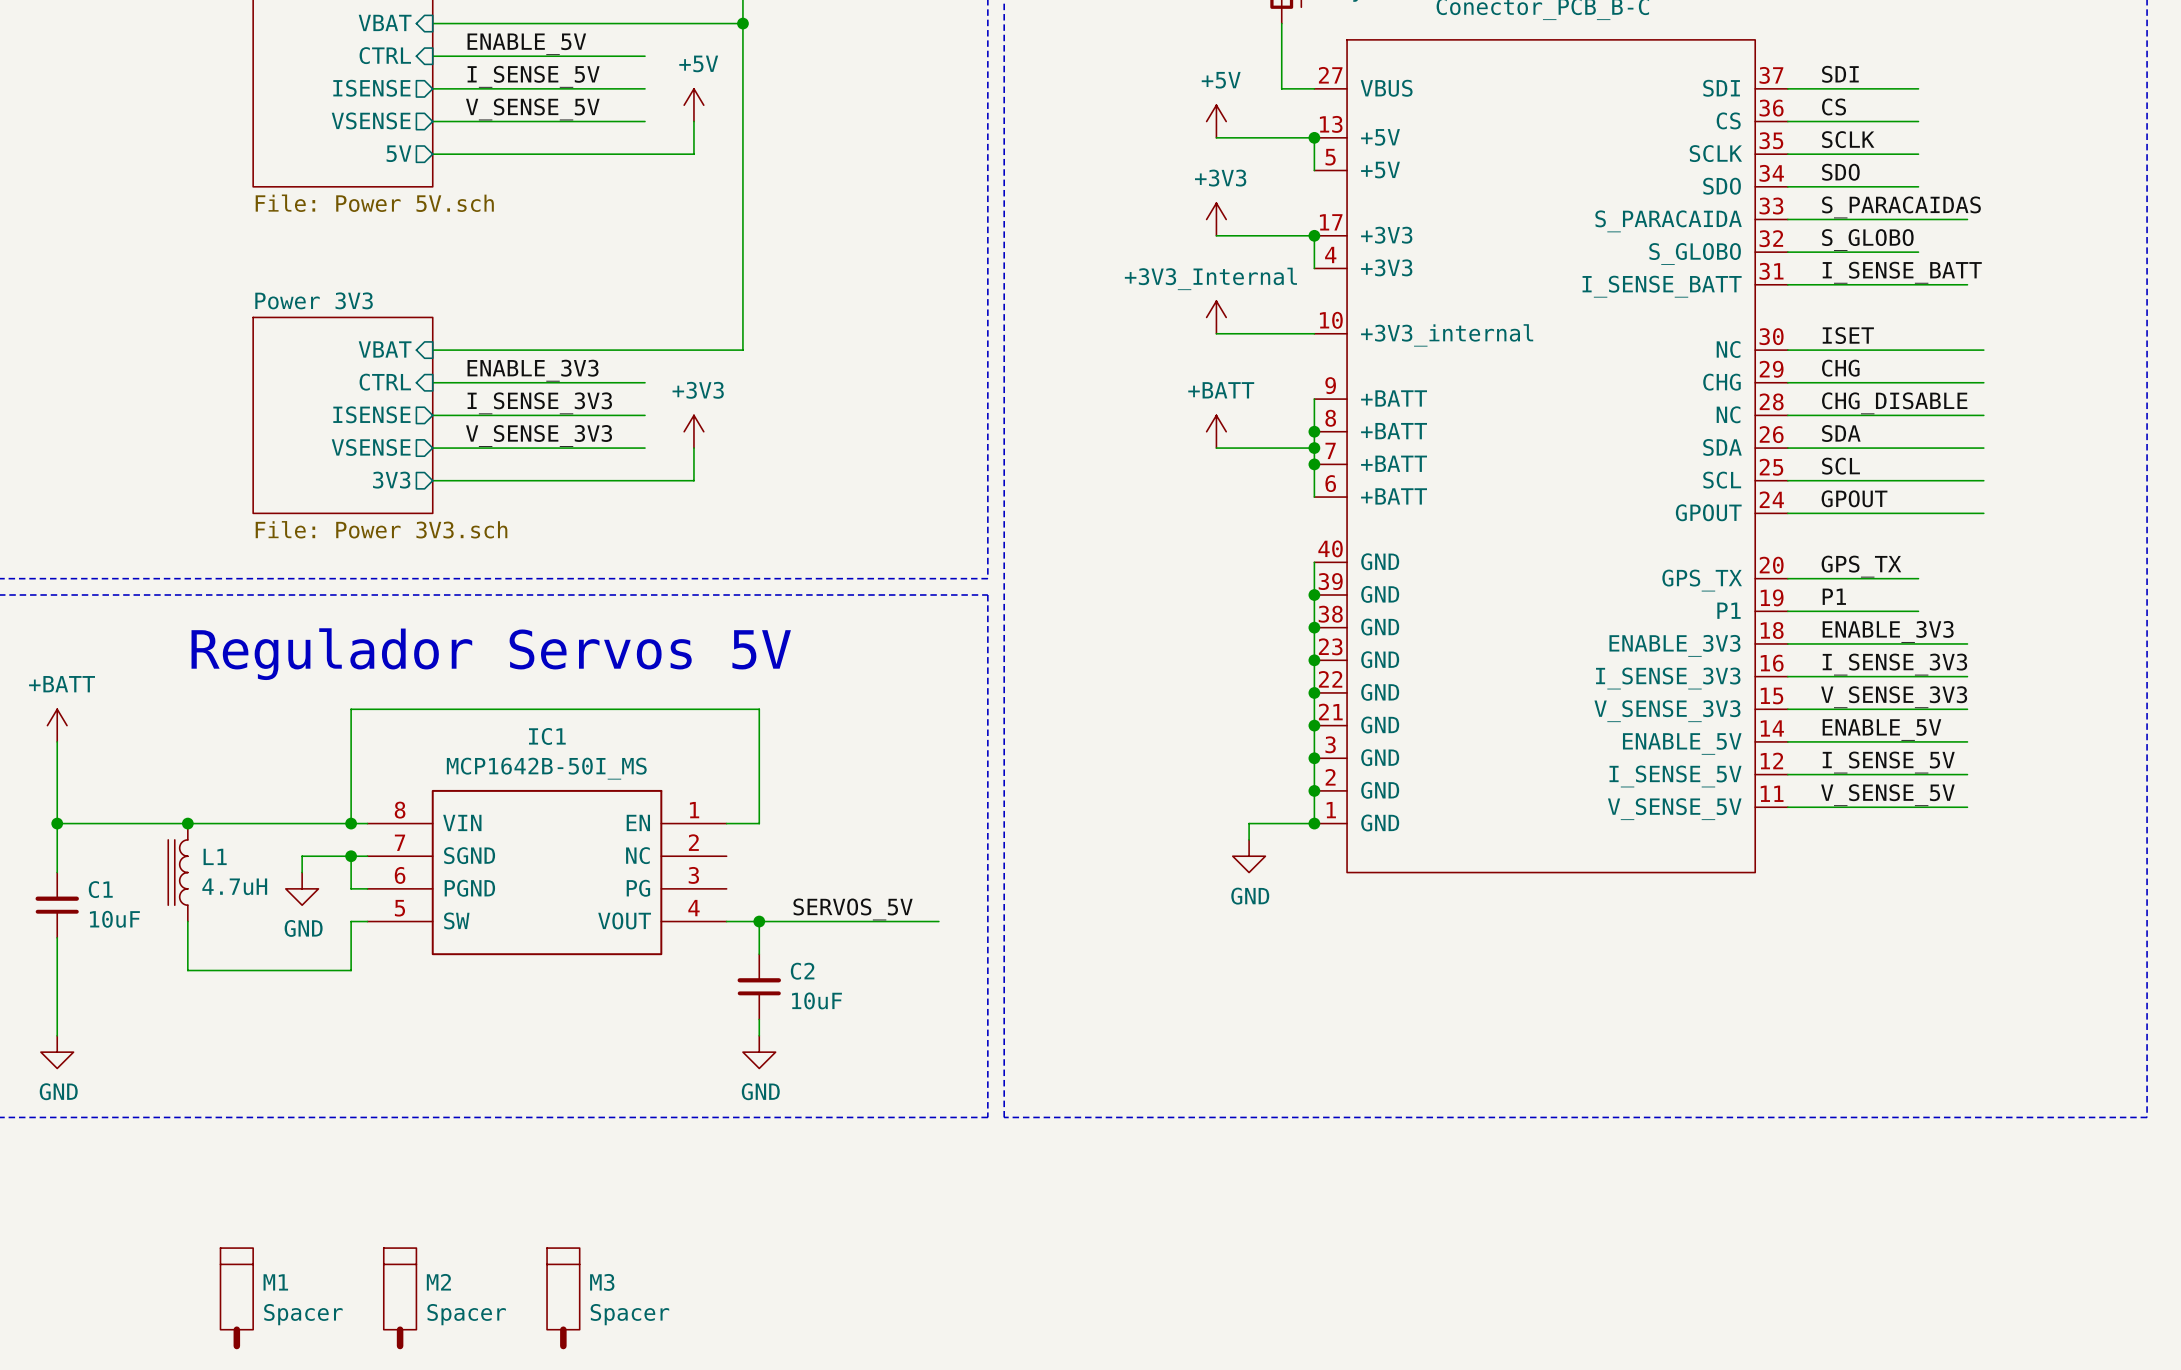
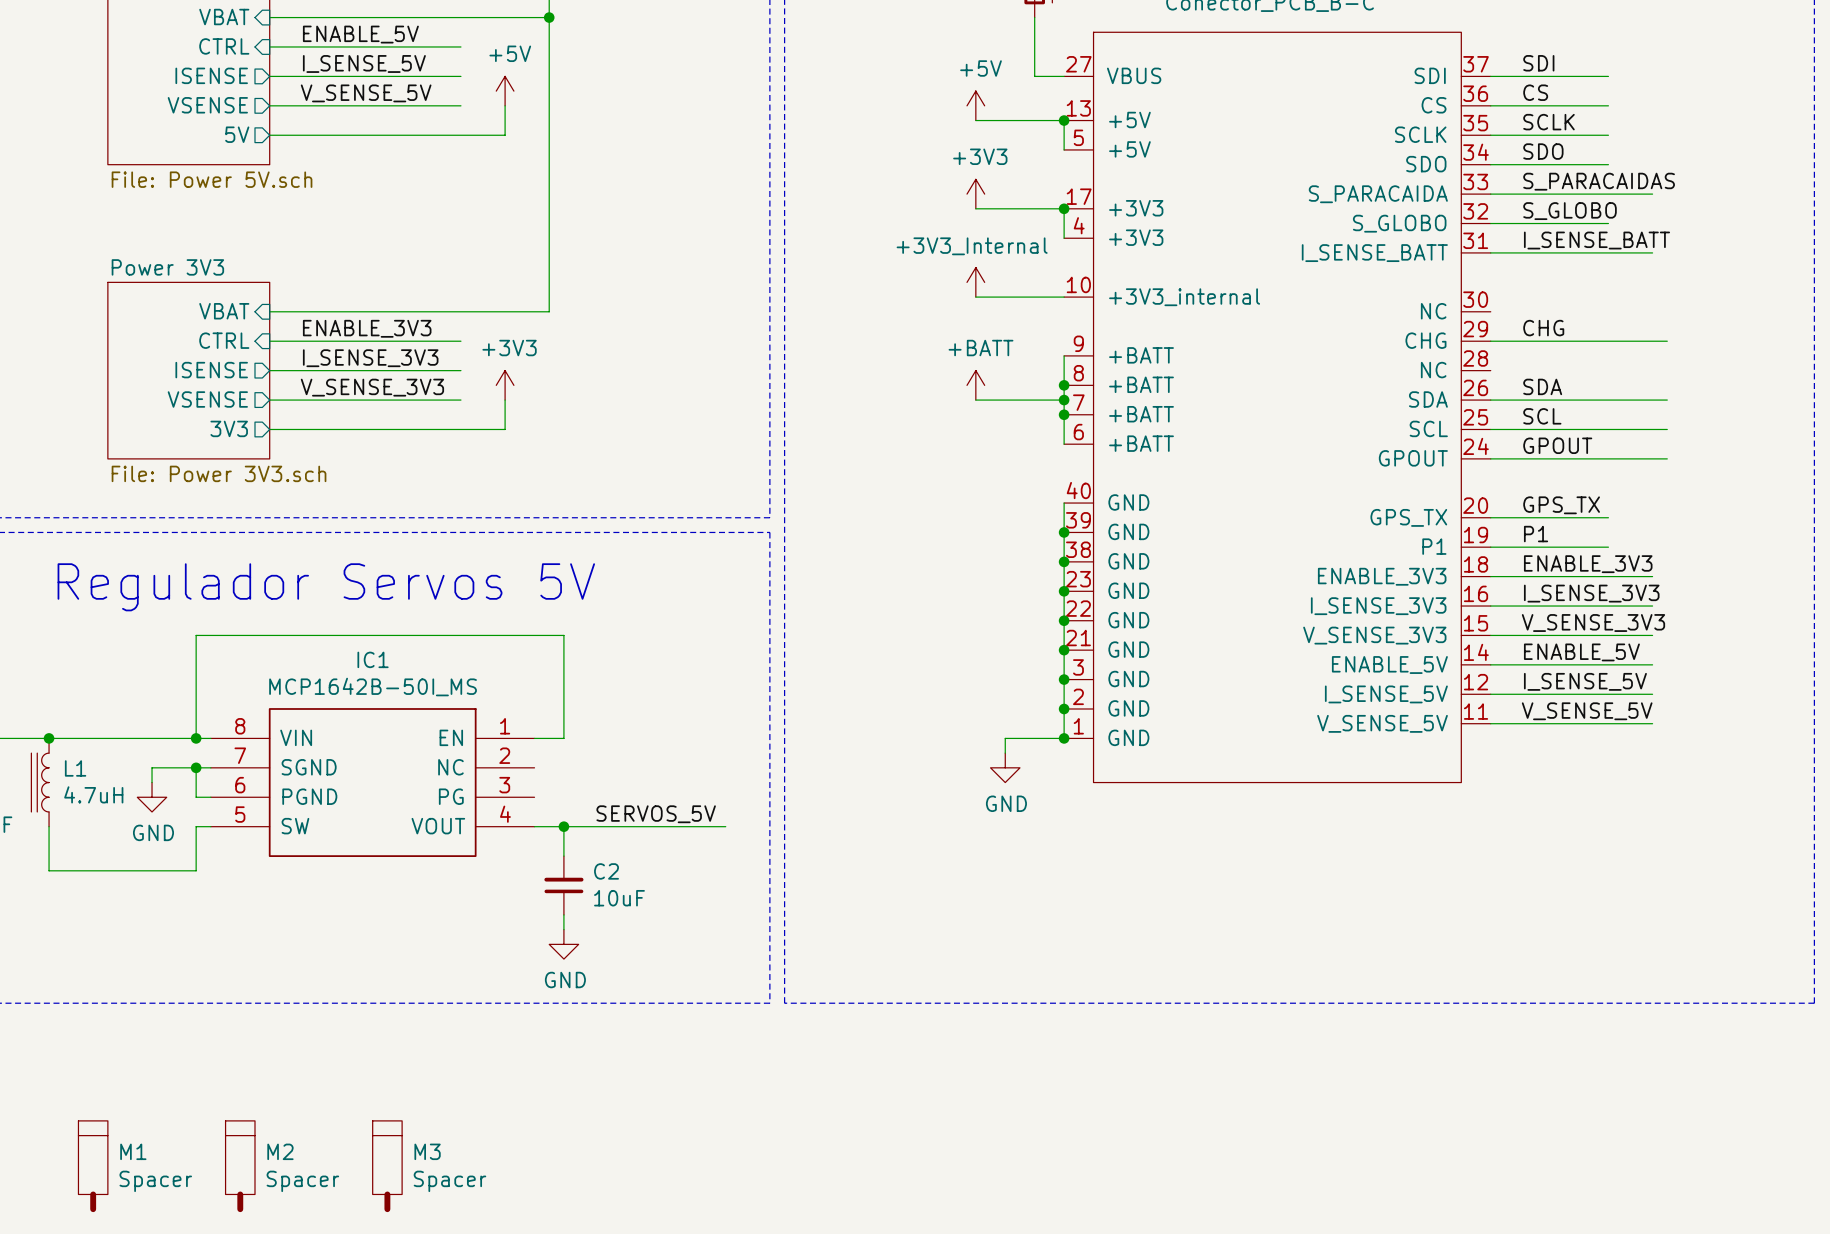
label: ISET (1848, 335) -> none
wire: (1787, 350) (1983, 350) -> none
label: CHG_DISABLE (1894, 403) -> none
wire: (1787, 415) (1983, 415) -> none

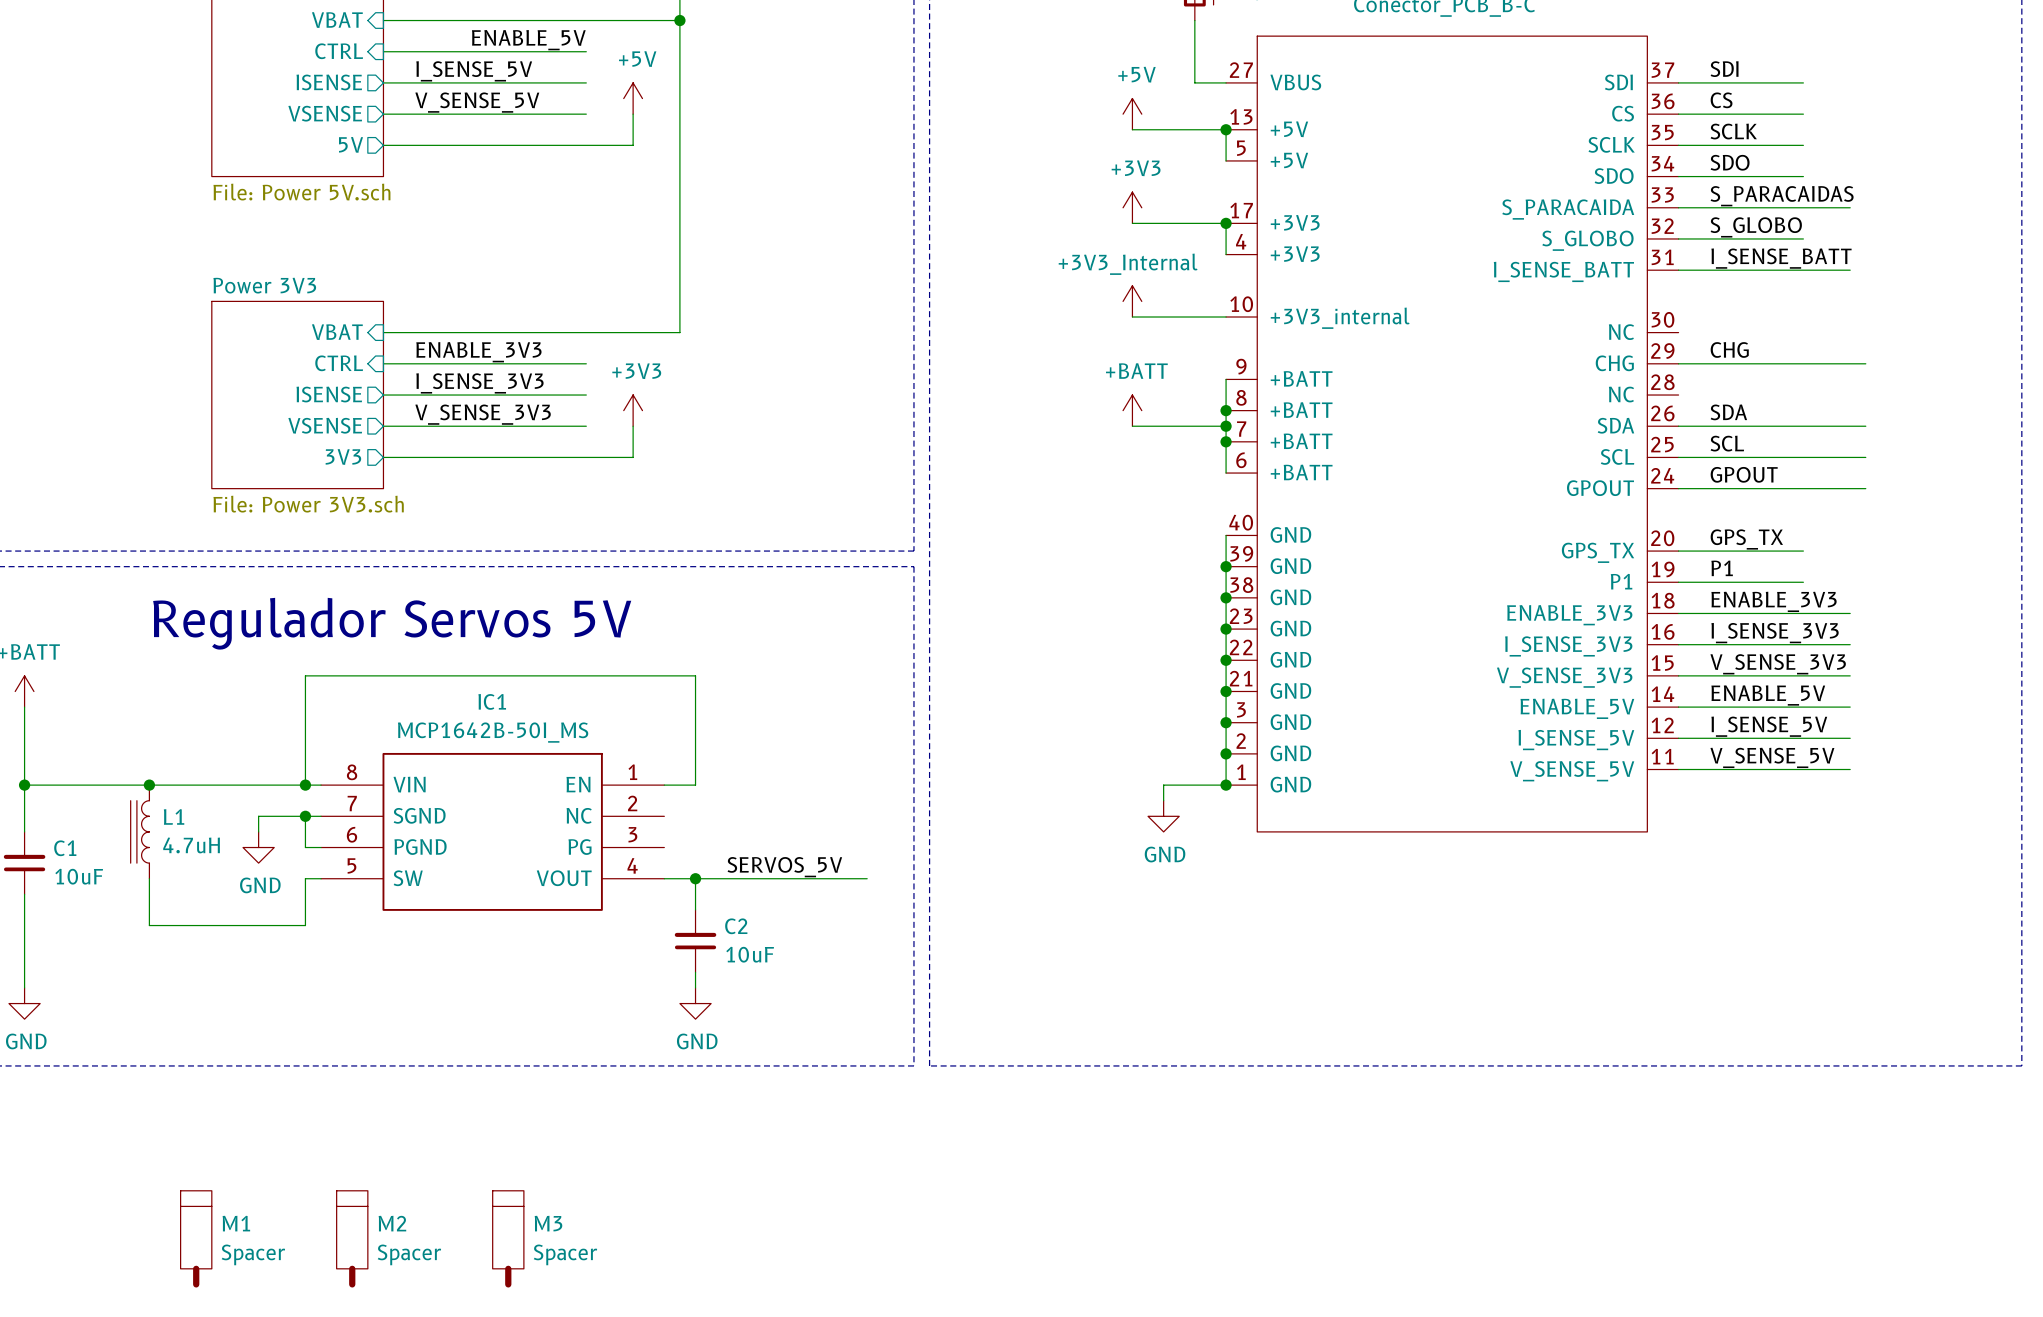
label position: ENABLE_5V (360, 34) -> ENABLE_5V (528, 40)

